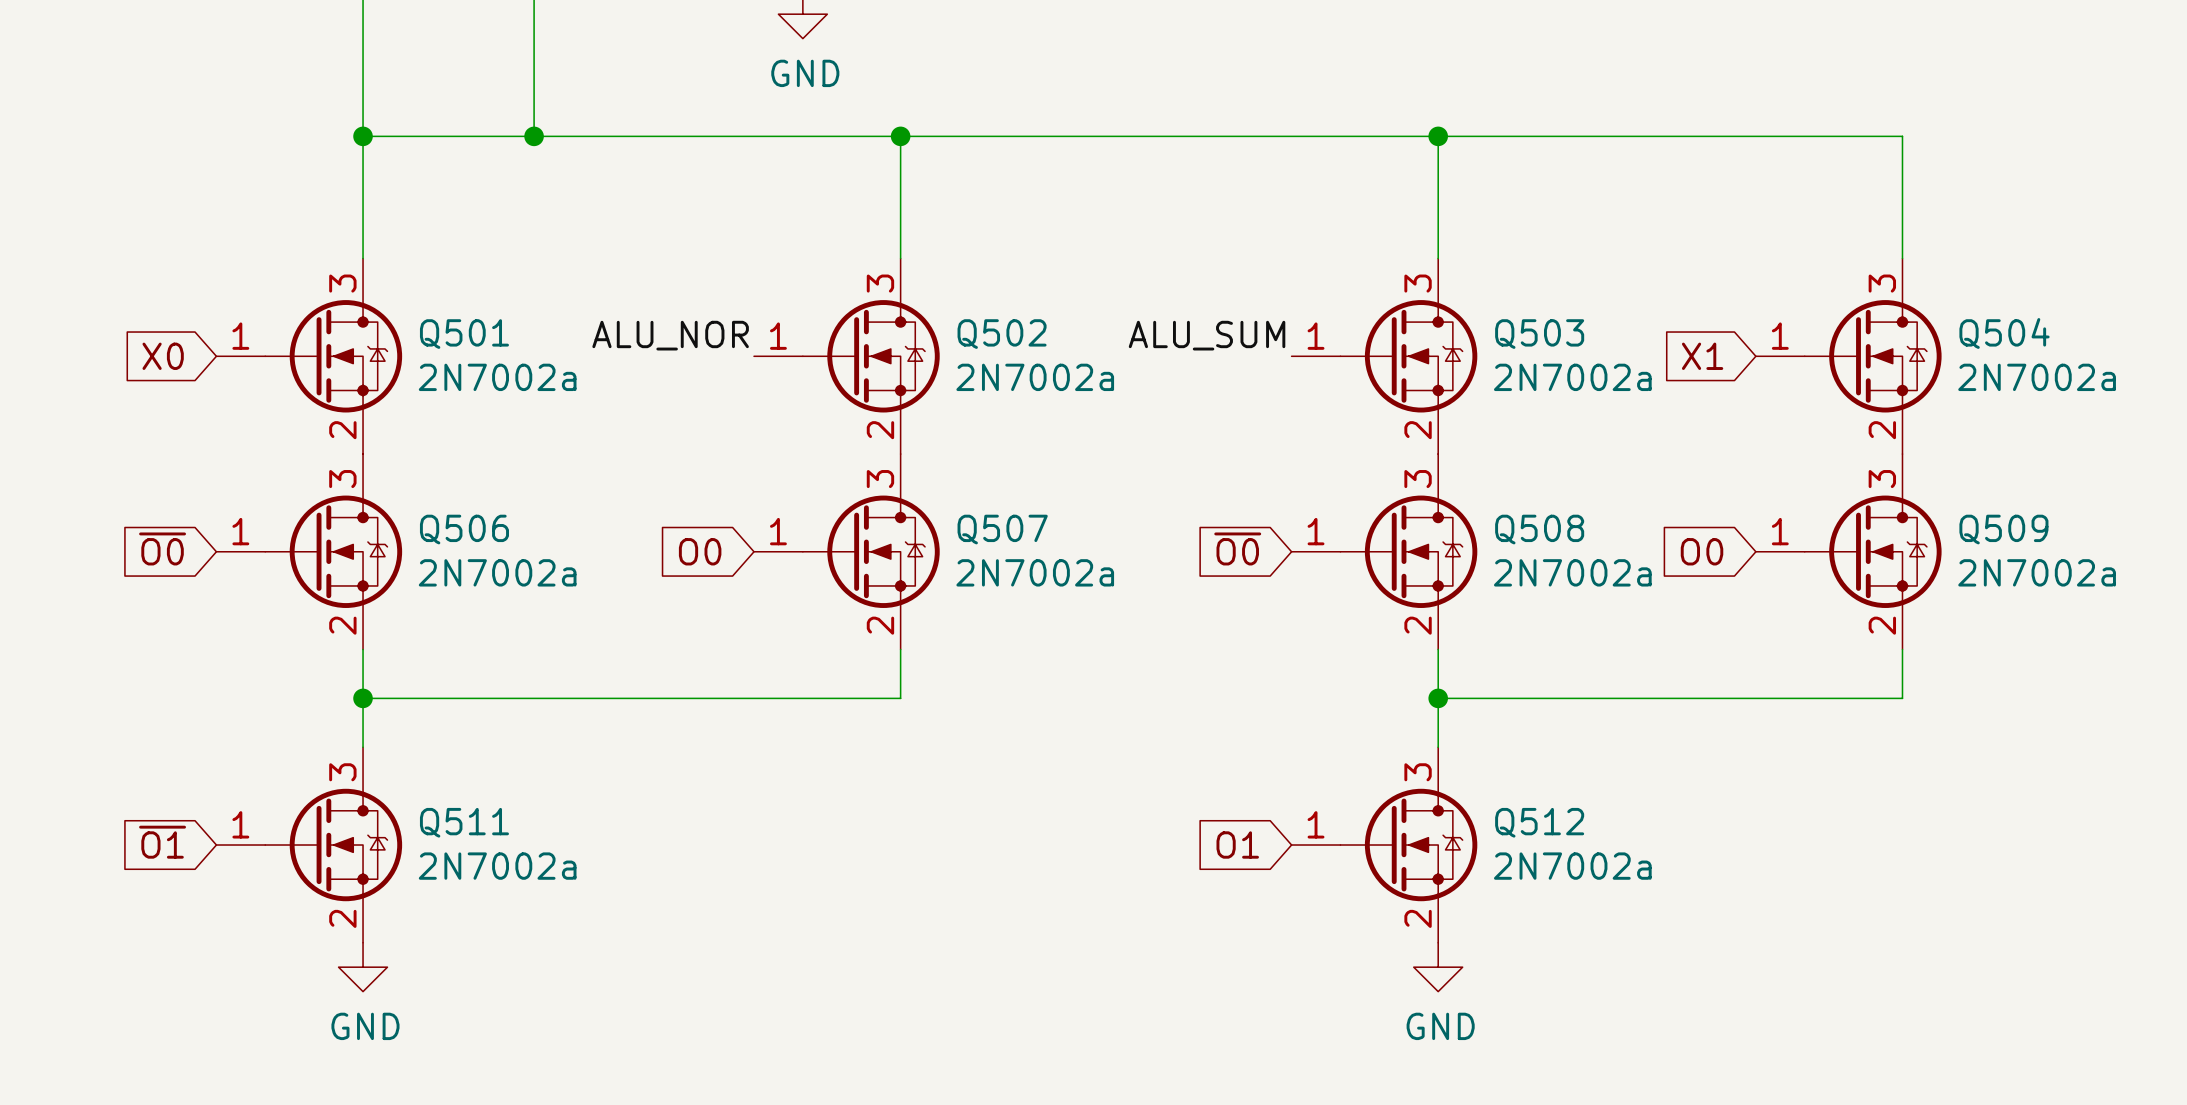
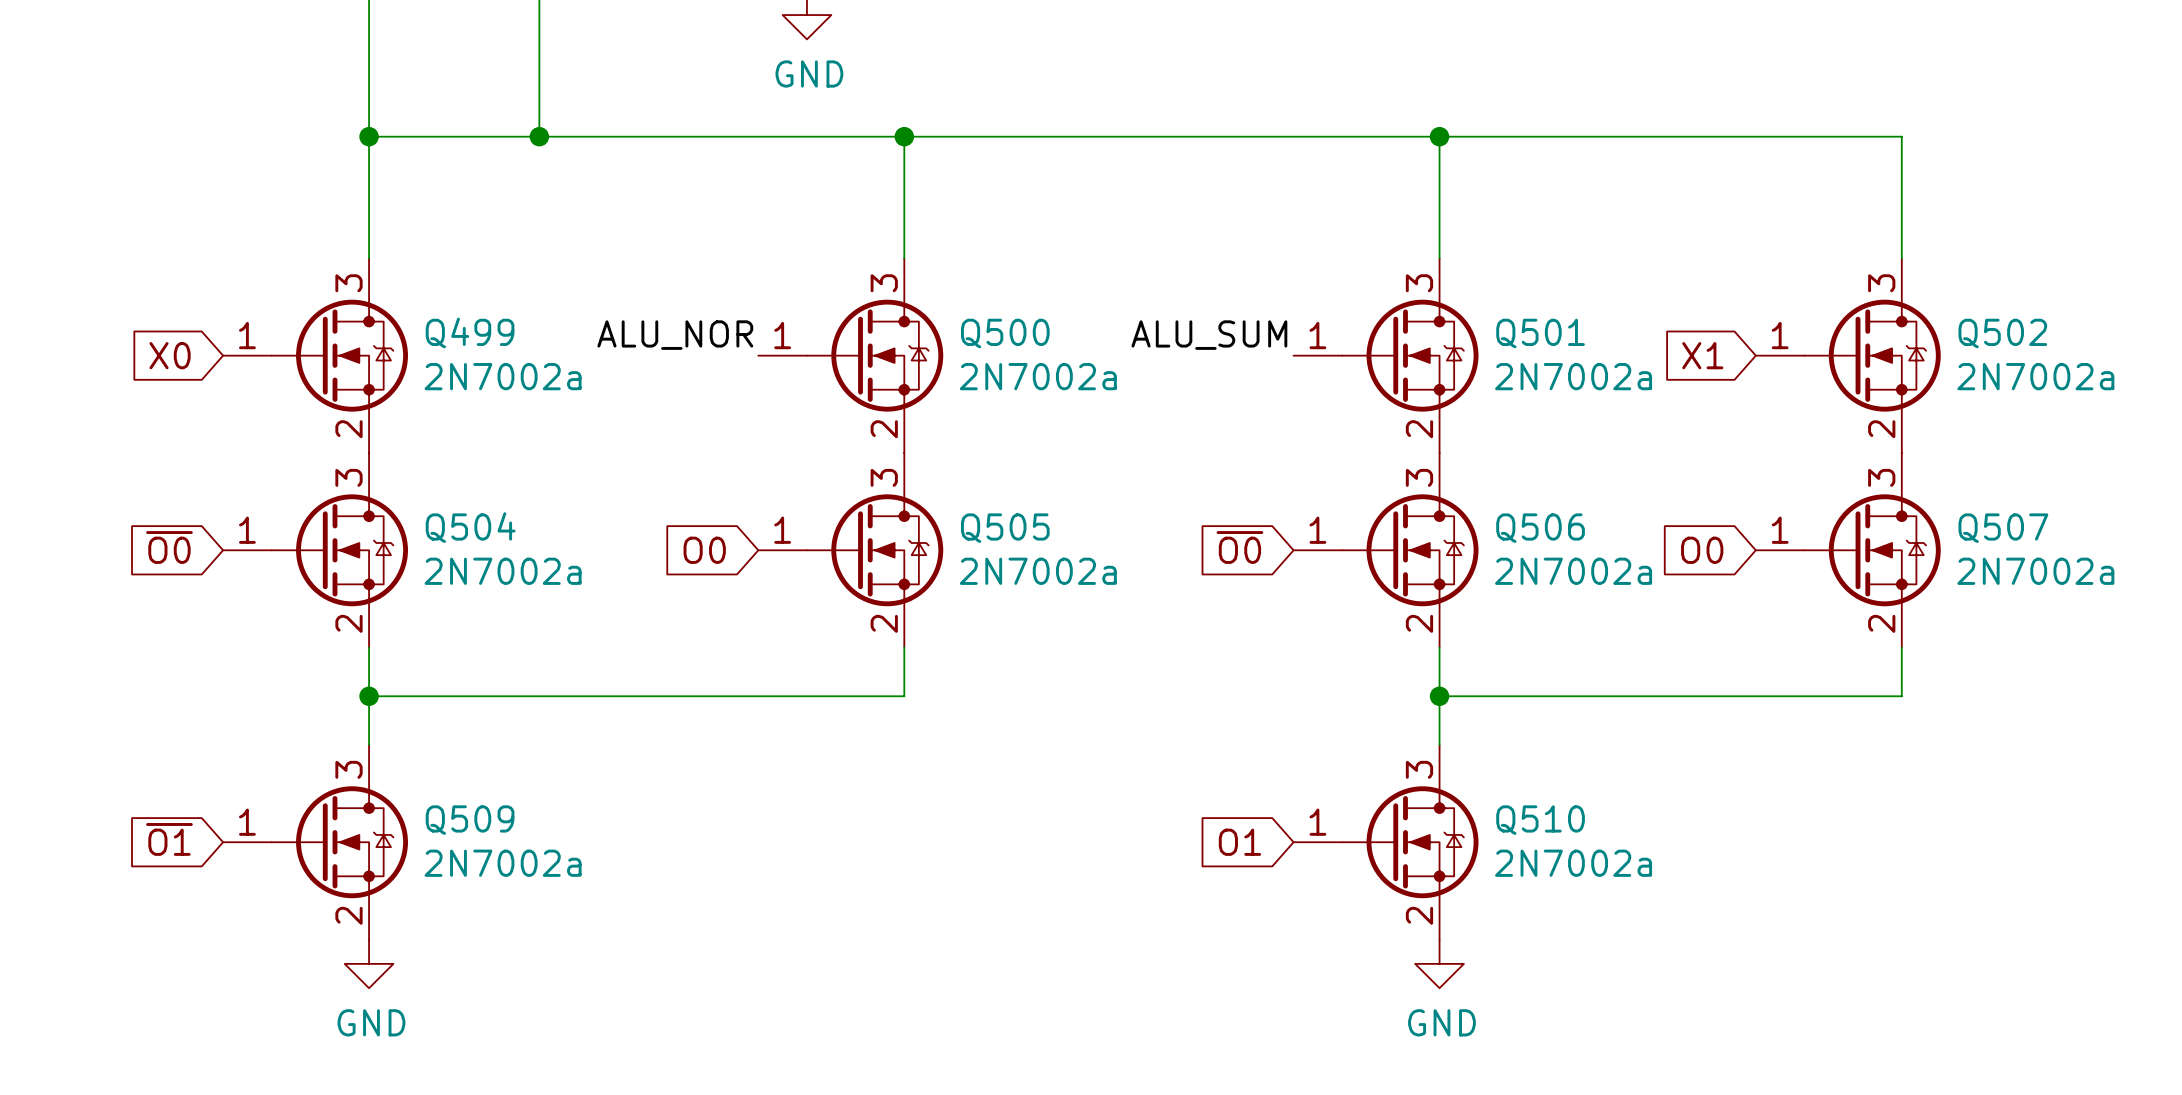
Q504 name: Q504 (2004, 333) -> Q502 (2002, 333)
Q501 name: Q501 (464, 334) -> Q499 (470, 332)
Q502 name: Q502 (1002, 334) -> Q500 (1005, 333)
Q503 name: Q503 (1539, 334) -> Q501 (1540, 333)
Q506 name: Q506 (464, 529) -> Q504 (470, 527)
Q507 name: Q507 (1002, 529) -> Q505 (1005, 528)
Q508 name: Q508 (1539, 529) -> Q506 (1540, 528)
Q509 name: Q509 (2003, 529) -> Q507 (2003, 528)
Q511 name: Q511 (464, 822) -> Q509 (470, 820)
Q512 name: Q512 (1539, 822) -> Q510 (1540, 820)

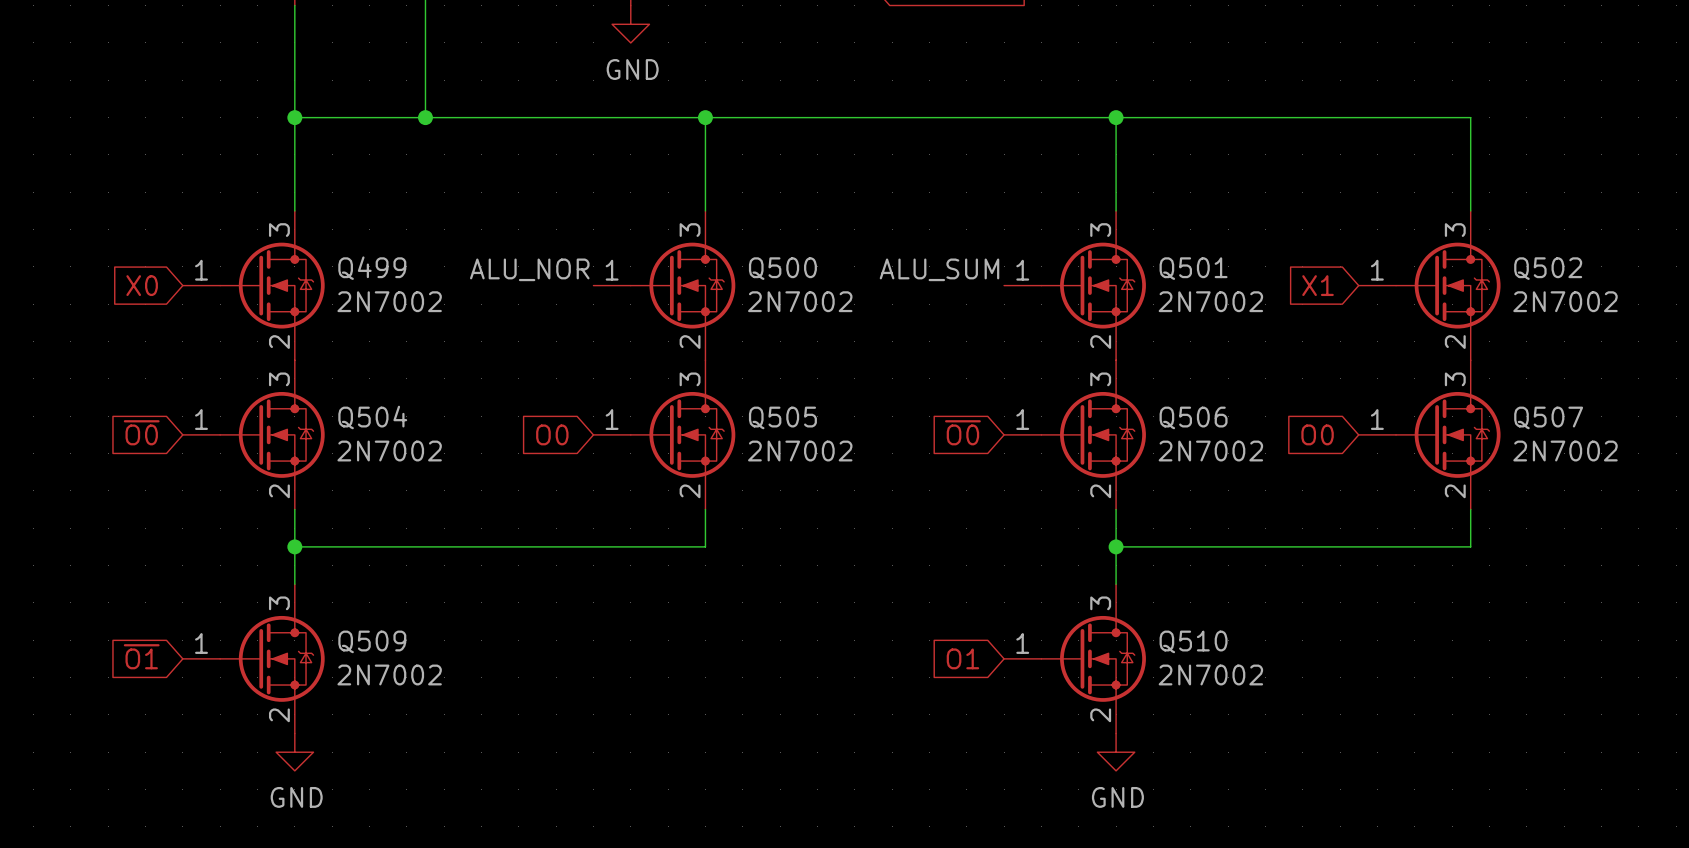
Q499 value: 2N7002a (503, 376) -> 2N7002 (389, 301)
Q500 value: 2N7002a (1038, 376) -> 2N7002 (800, 301)
Q501 value: 2N7002a (1573, 376) -> 2N7002 (1210, 301)
Q502 value: 2N7002a (2035, 376) -> 2N7002 (1565, 301)
Q504 value: 2N7002a (503, 571) -> 2N7002 (389, 451)
Q505 value: 2N7002a (1038, 571) -> 2N7002 (800, 451)
Q506 value: 2N7002a (1573, 571) -> 2N7002 (1210, 451)
Q507 value: 2N7002a (2035, 571) -> 2N7002 (1565, 451)
Q509 value: 2N7002a (503, 863) -> 2N7002 (389, 674)
Q510 value: 2N7002a (1573, 863) -> 2N7002 (1210, 674)

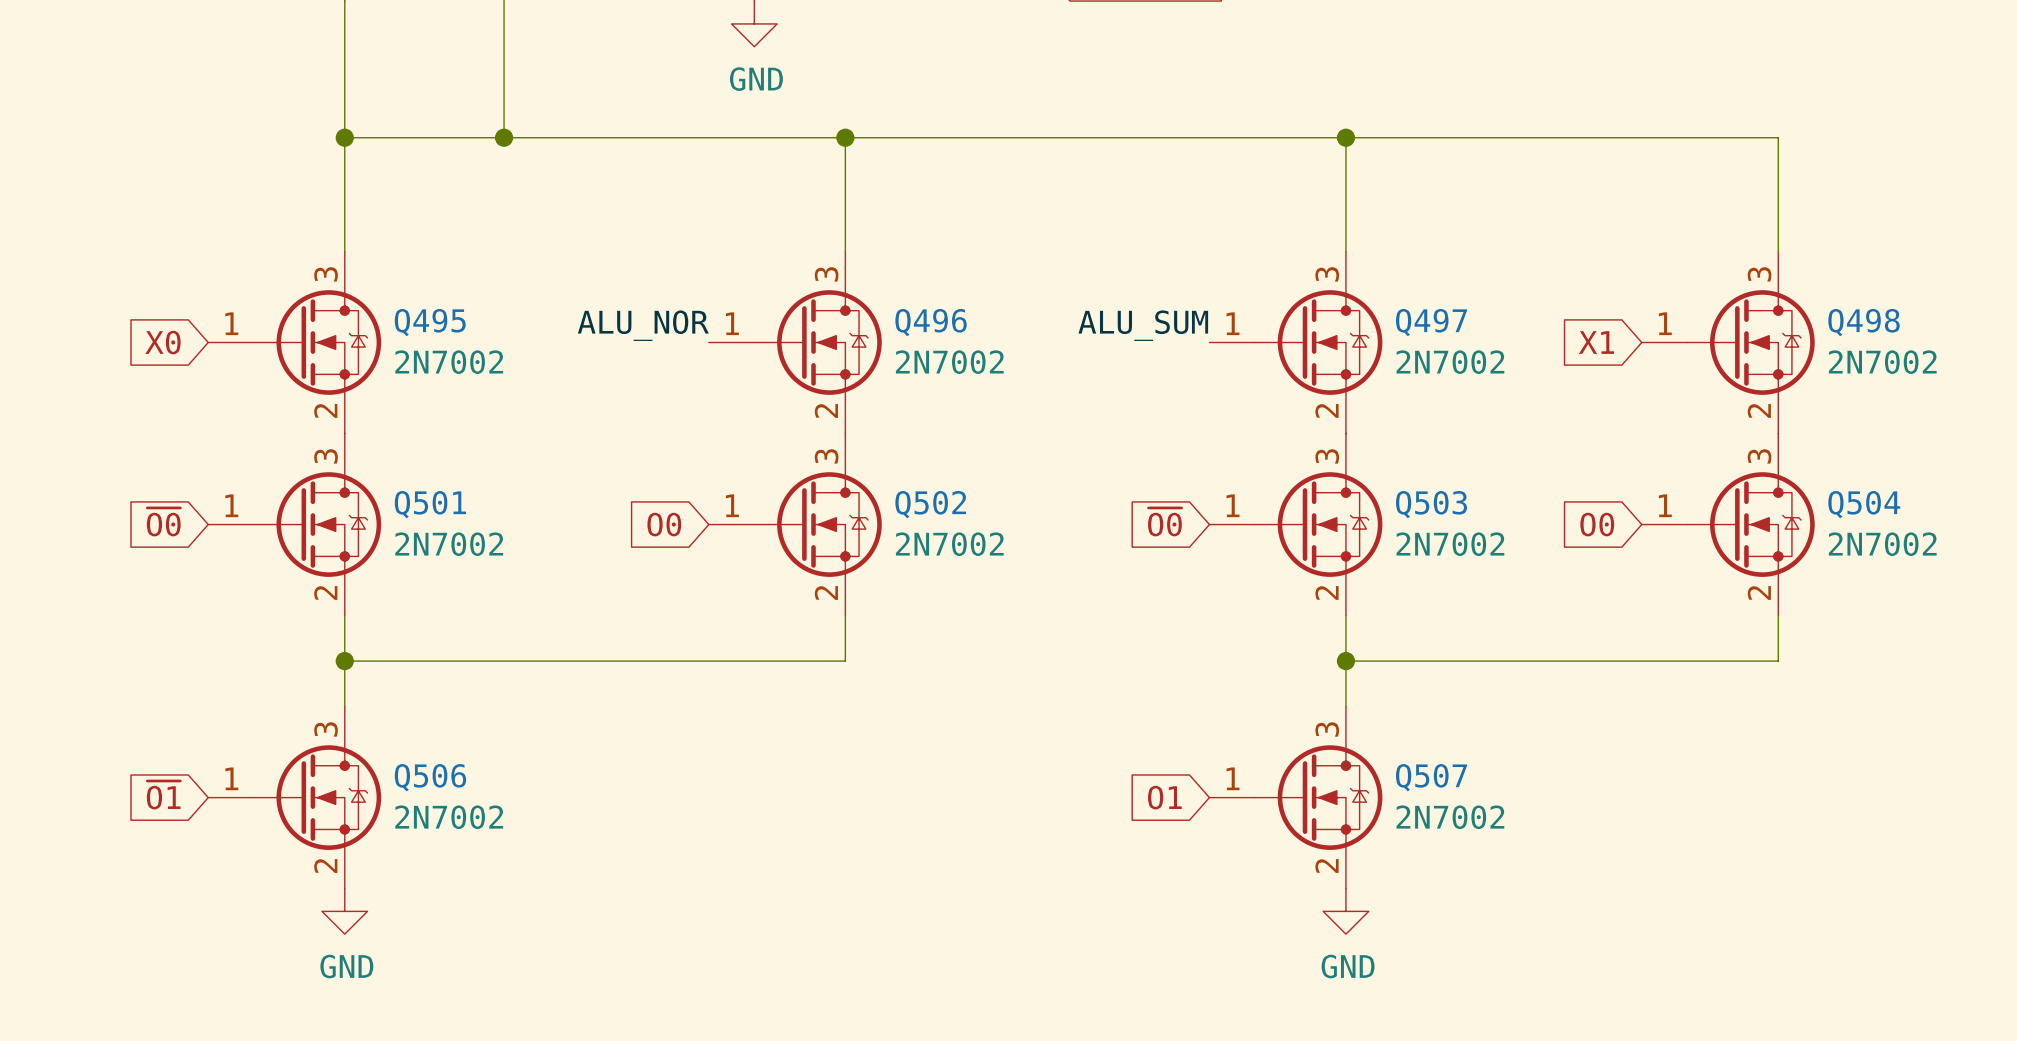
Q499 name: Q499 (372, 268) -> Q495 (430, 322)
Q500 name: Q500 (782, 268) -> Q496 (931, 322)
Q501 name: Q501 (1193, 268) -> Q497 (1431, 322)
Q502 name: Q502 (1548, 268) -> Q498 (1864, 322)
Q504 name: Q504 (372, 417) -> Q501 (430, 504)
Q505 name: Q505 (782, 417) -> Q502 (930, 504)
Q506 name: Q506 (1193, 417) -> Q503 (1431, 504)
Q507 name: Q507 (1548, 417) -> Q504 (1864, 504)
Q509 name: Q509 (372, 641) -> Q506 (430, 777)
Q510 name: Q510 (1193, 641) -> Q507 (1431, 777)

